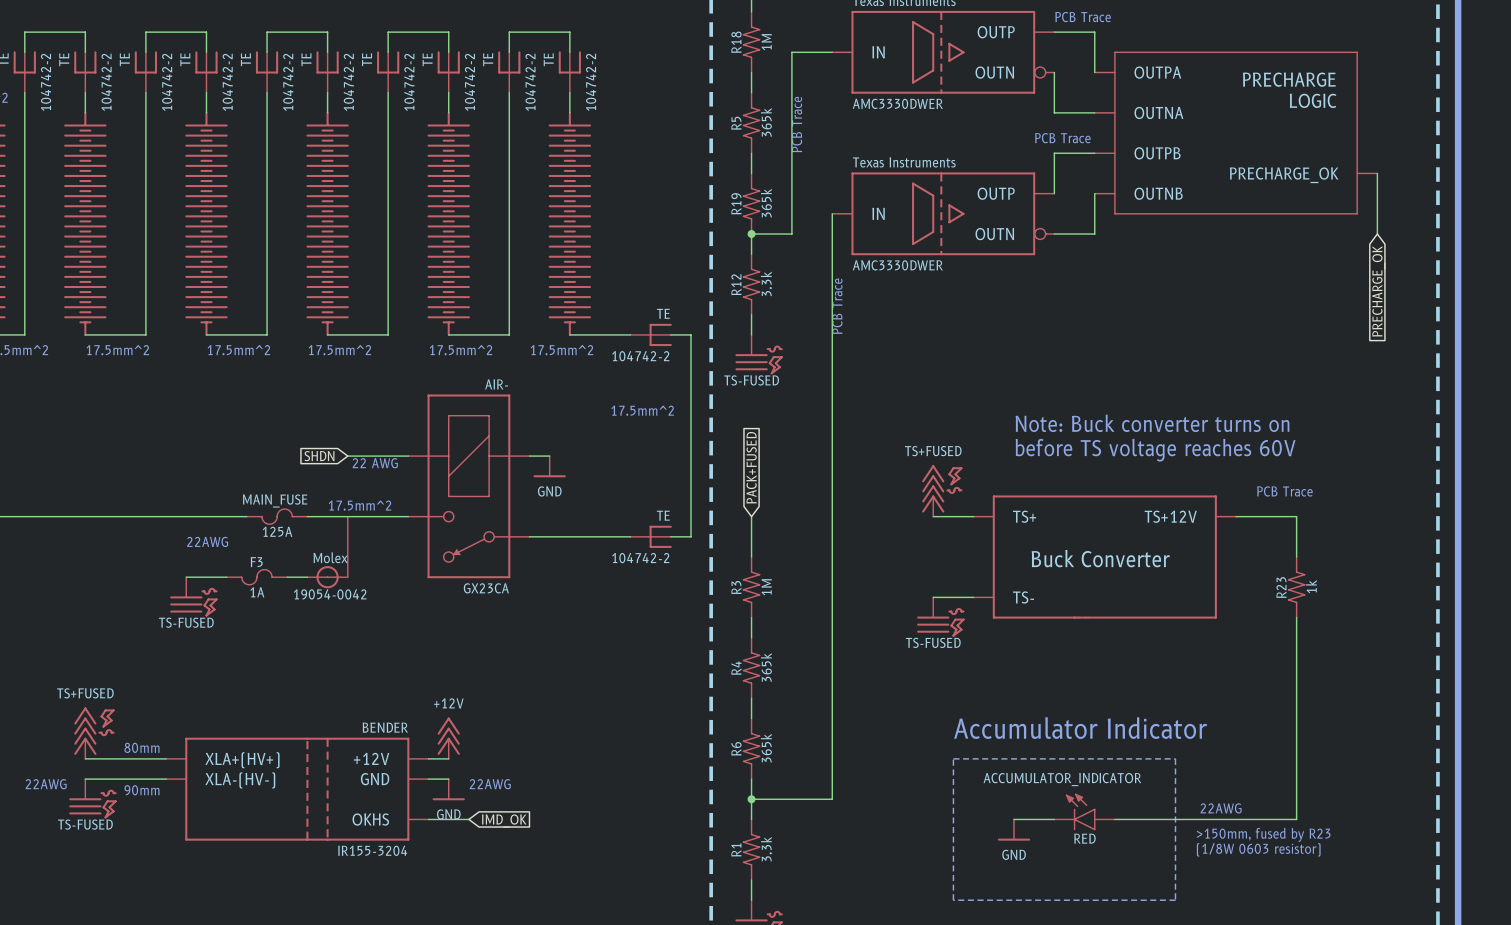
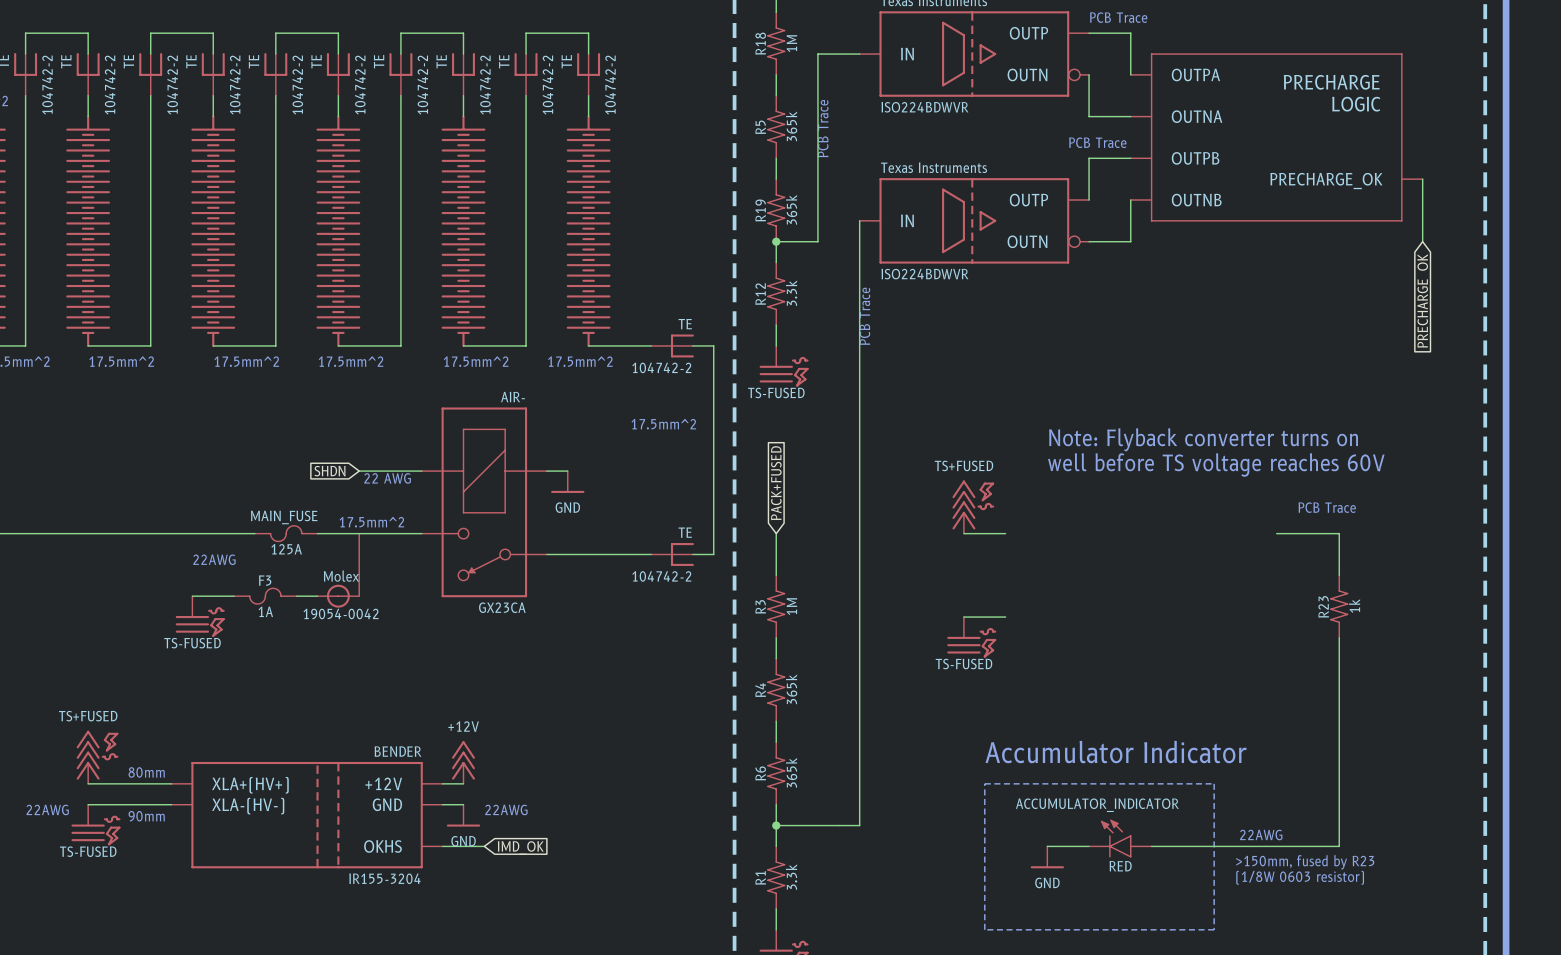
part text: AMC3330DWER (897, 103) -> ISO224BDWVR (924, 107)
part text: AMC3330DWER (897, 265) -> ISO224BDWVR (924, 274)
text: Note: Buck converter turns on (1152, 423) -> Note: Flyback converter turns on (1203, 439)
text: before TS voltage reaches 60V (1155, 450) -> well before TS voltage reaches 60V (1216, 465)
part: (1104, 557) -> none

